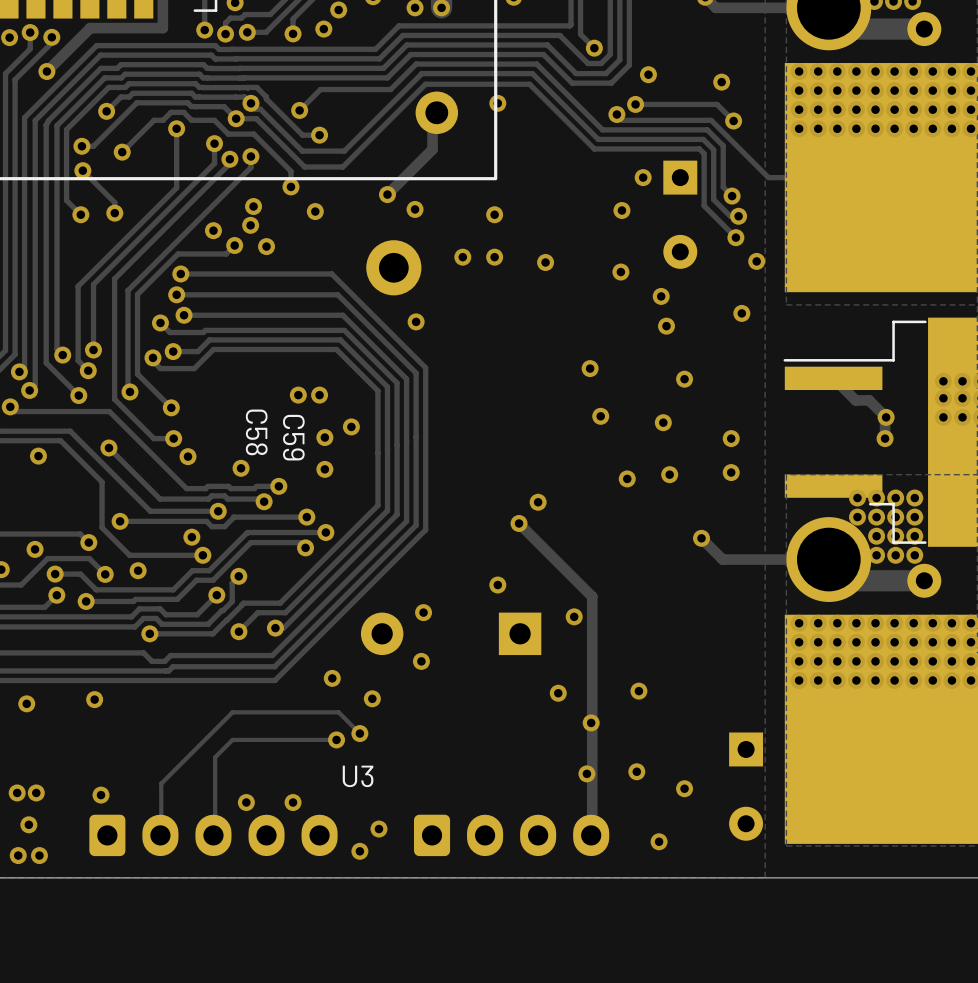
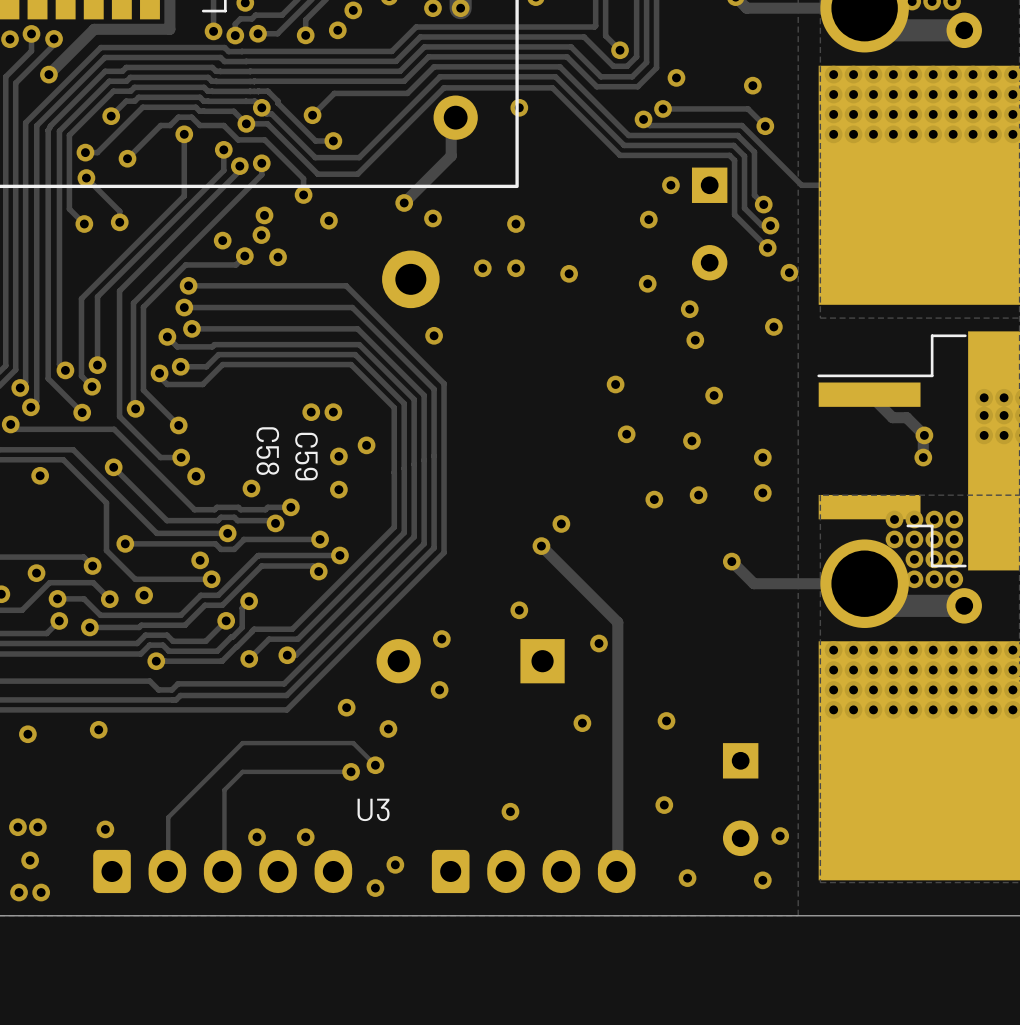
via: (591, 722) -> none
via: (586, 773) -> none
via: none -> (510, 811)
part position: (746, 786) -> (740, 799)
via: (684, 788) -> none
via: none -> (780, 836)
via: none -> (762, 880)

